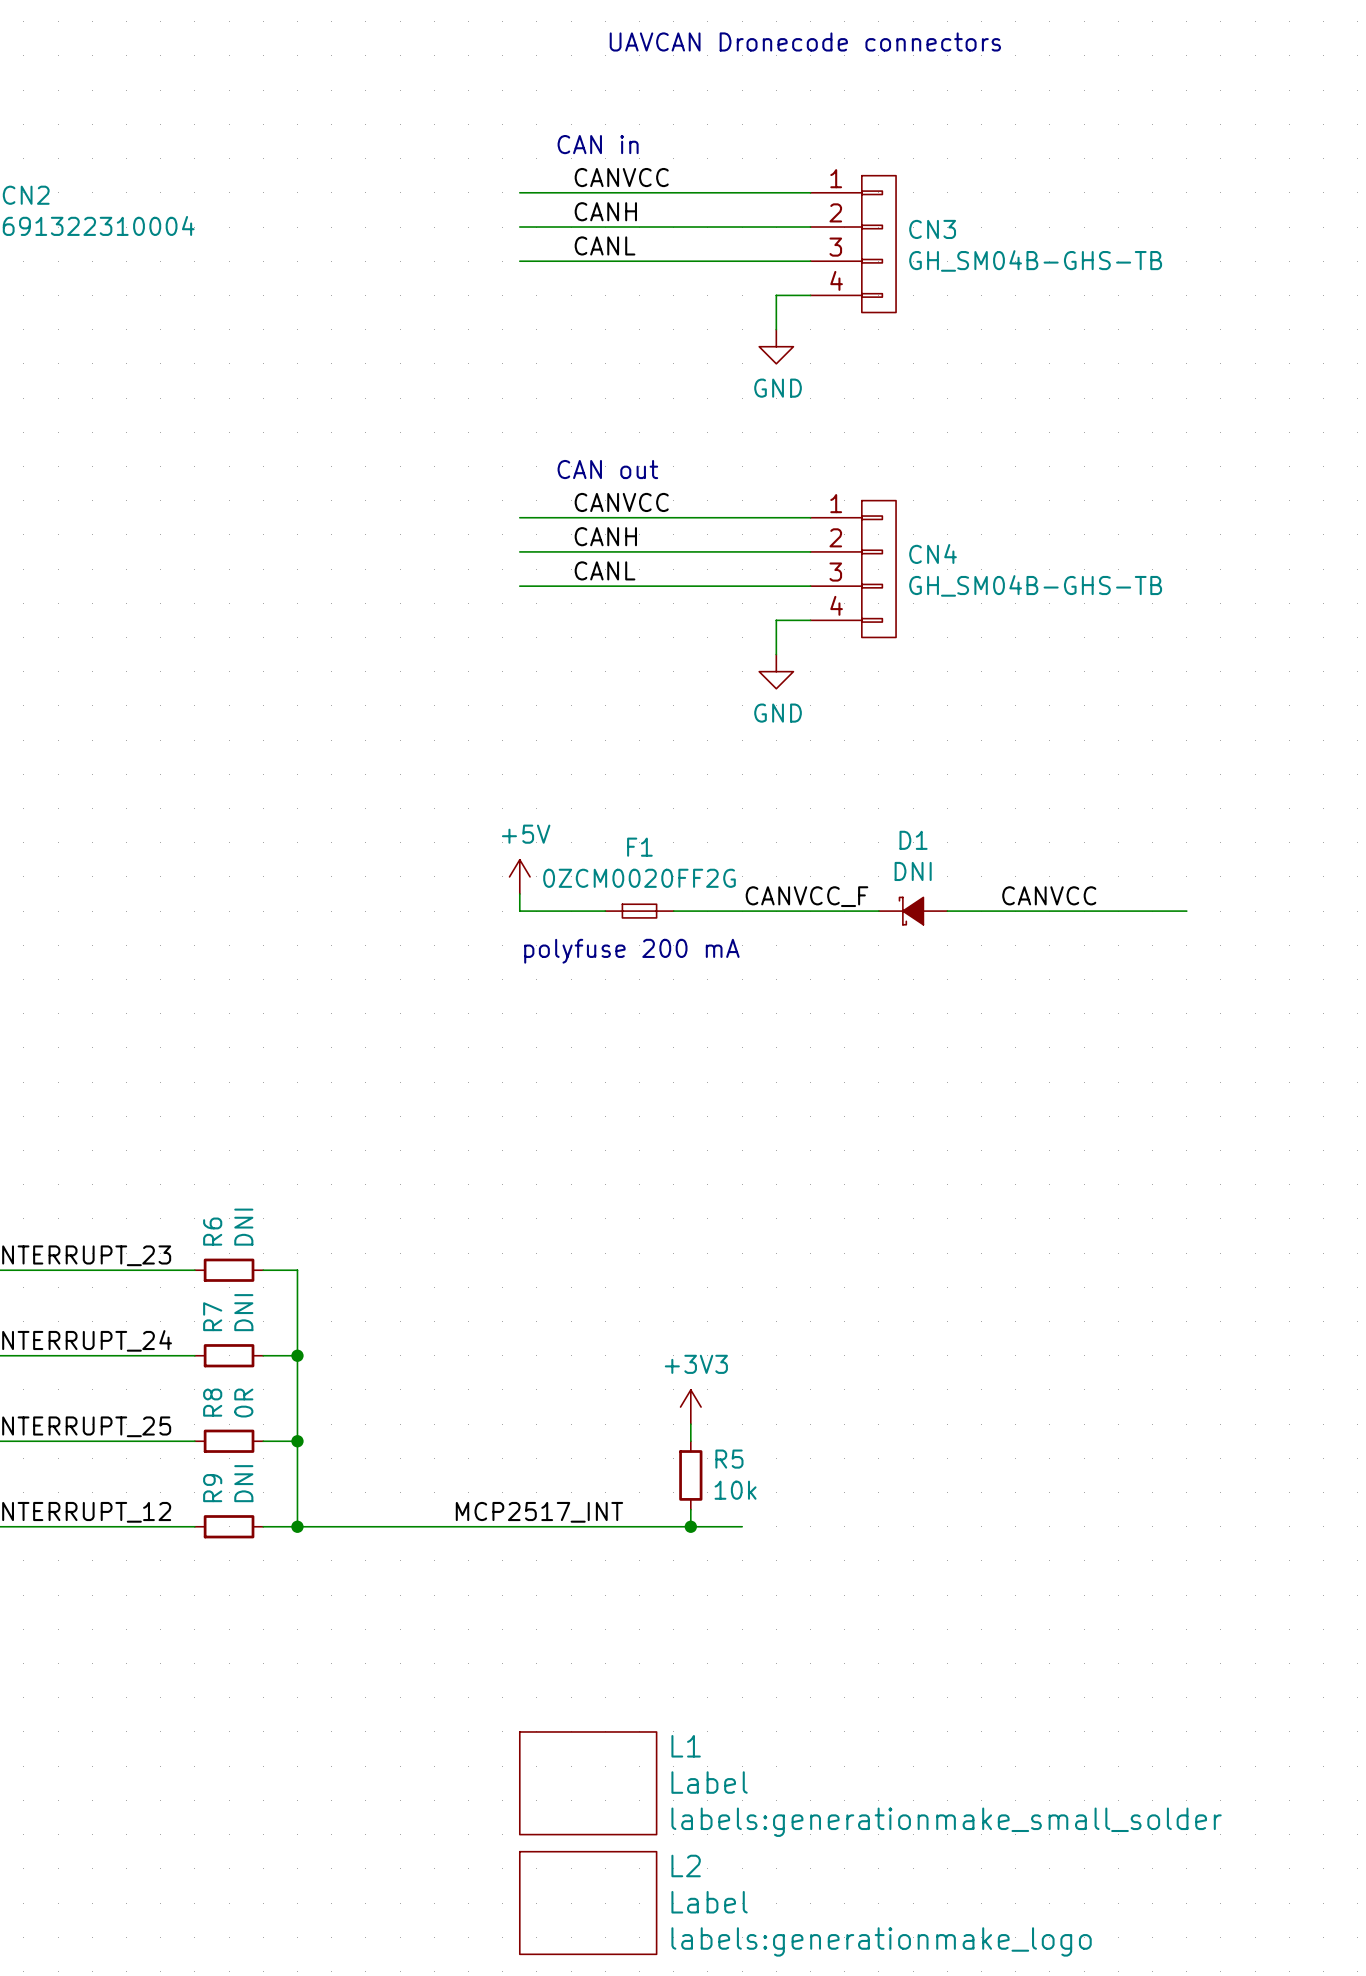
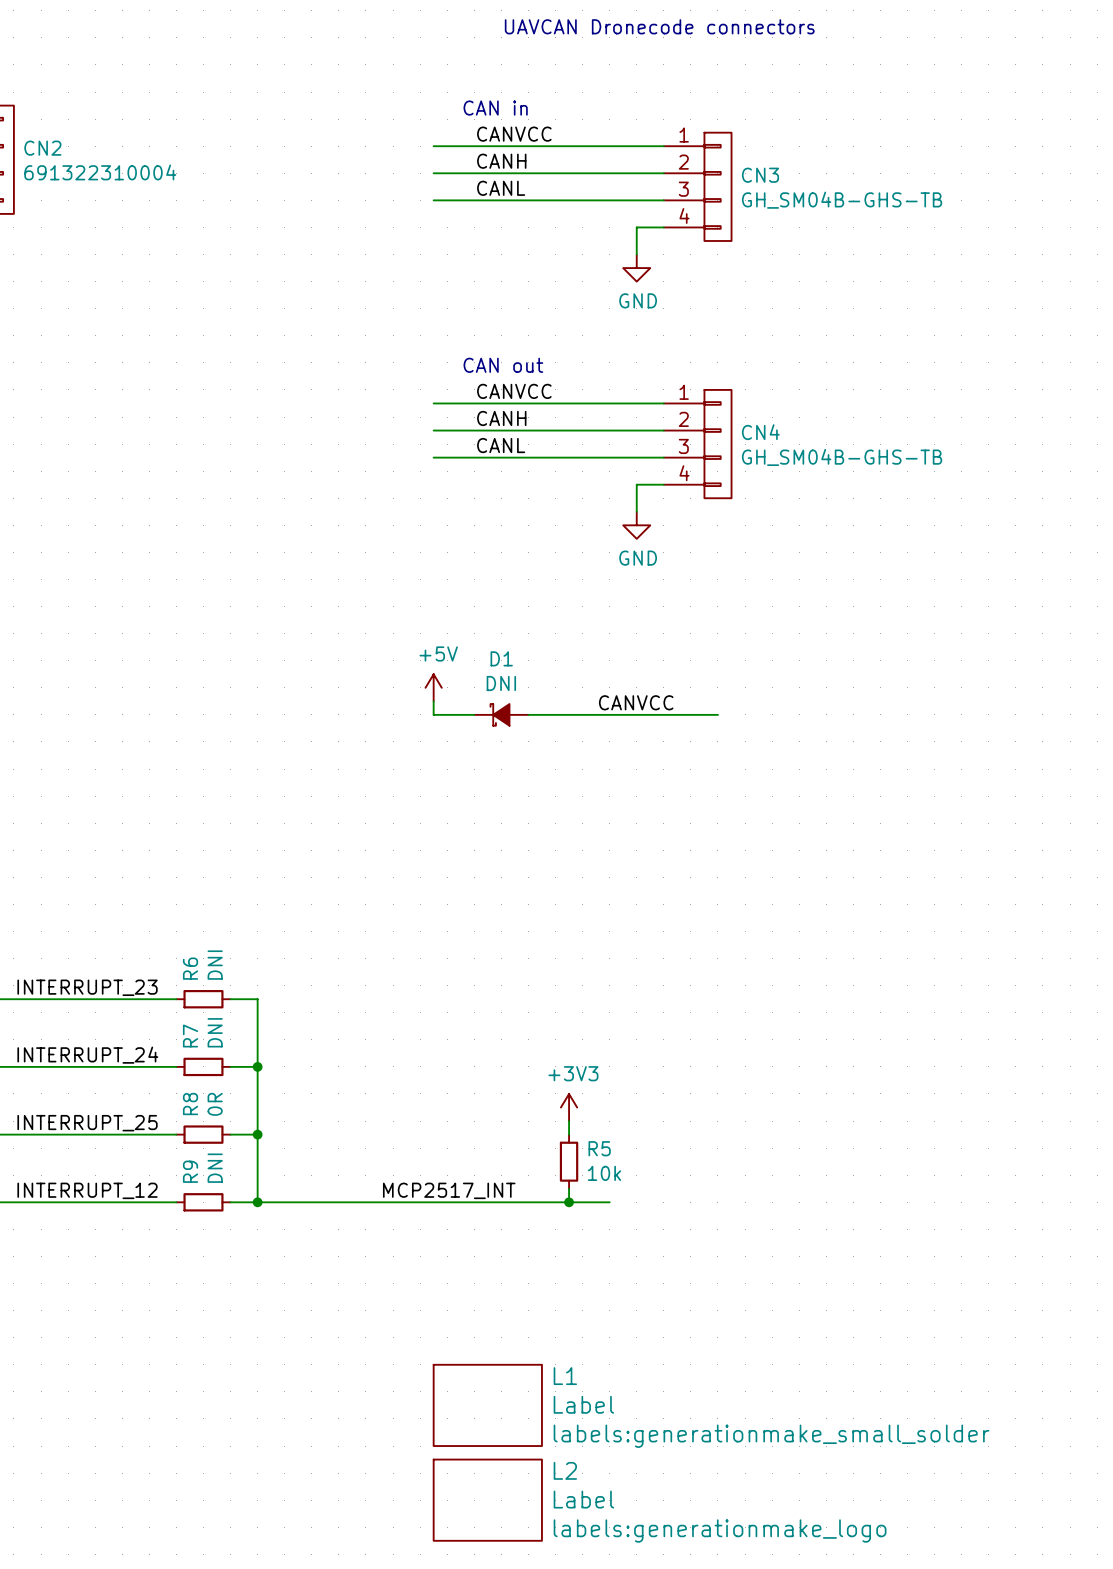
label position: CANVCC (1049, 895) -> CANVCC (636, 702)
label: CANVCC_F (806, 896) -> none
F1: 0ZCM0020FF2G (639, 911) -> none
D1 position: (913, 911) -> (501, 714)
wire: (947, 911) (1186, 911) -> none
text: polyfuse 200 mA (631, 951) -> none

